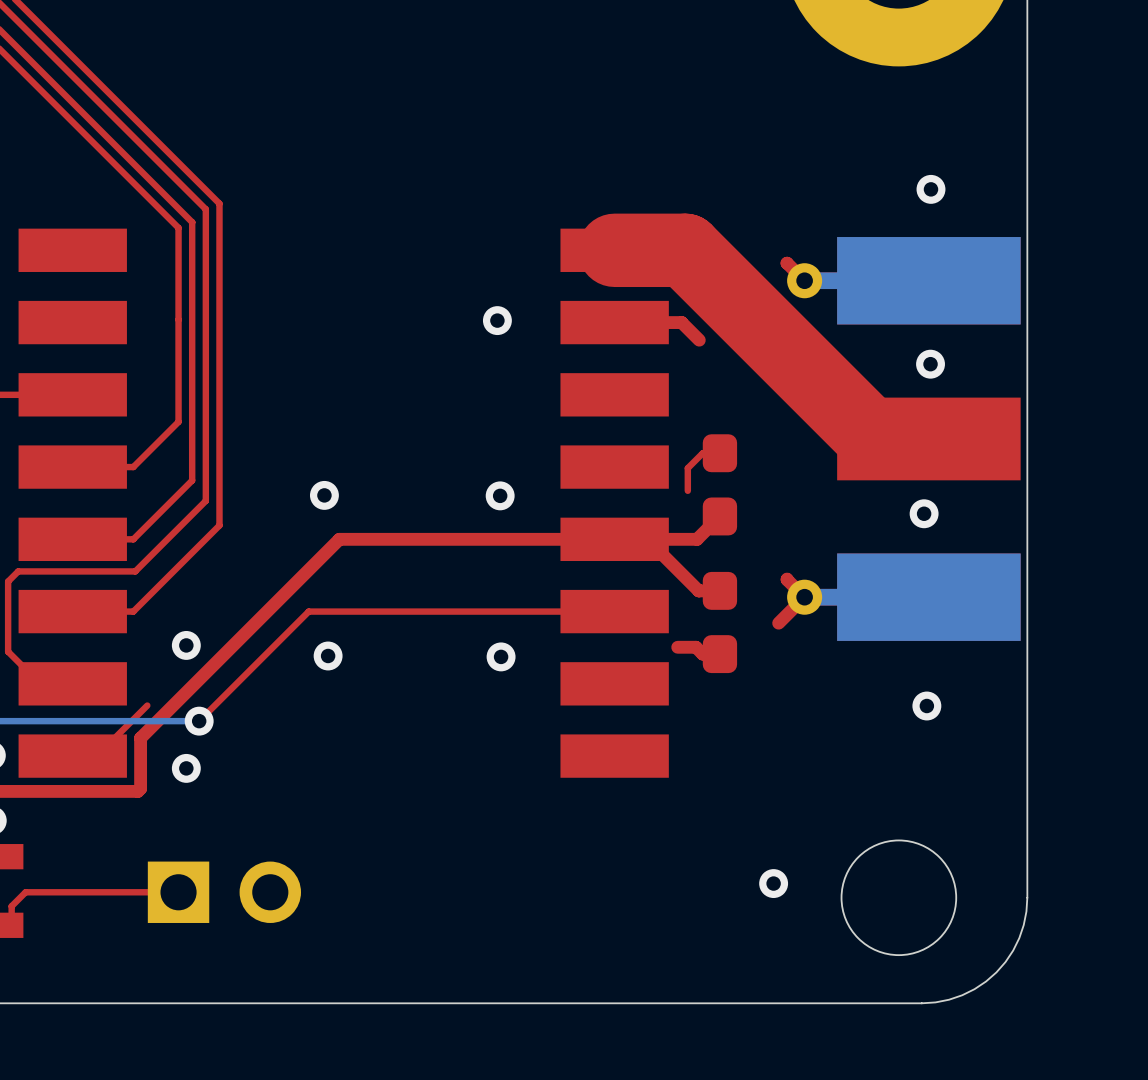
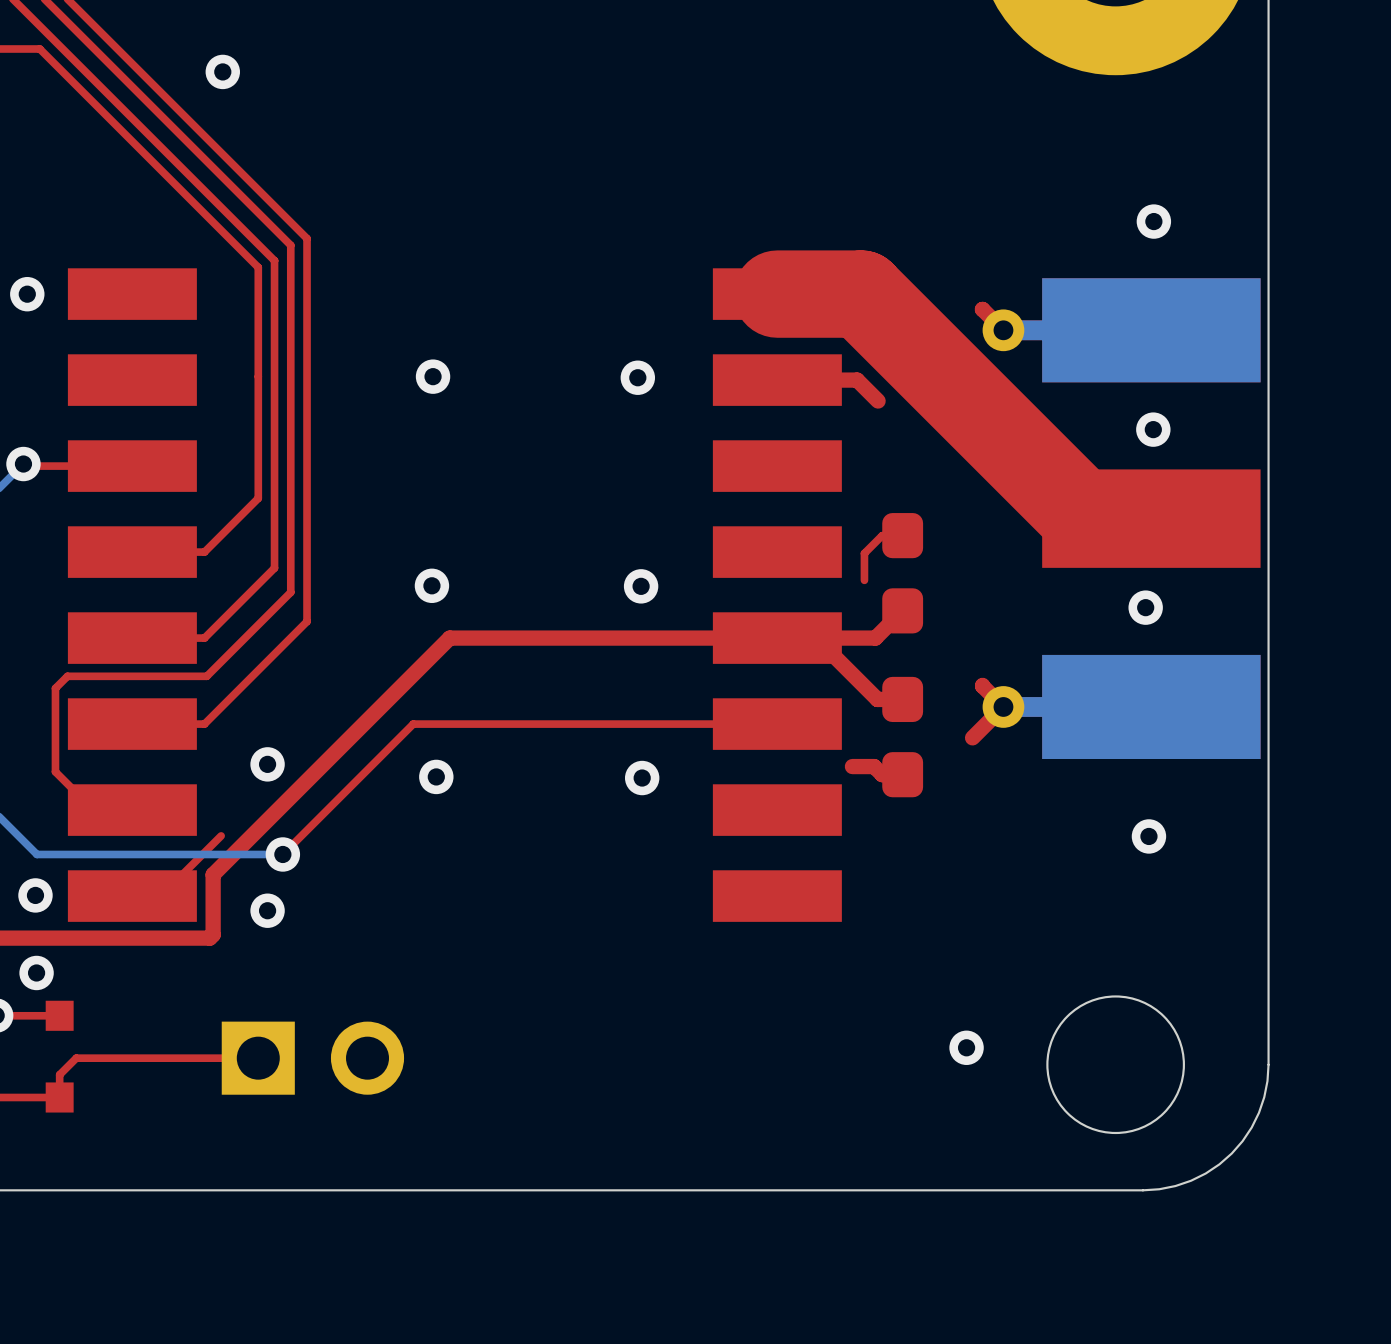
via: none -> (222, 71)
via: none -> (433, 376)

